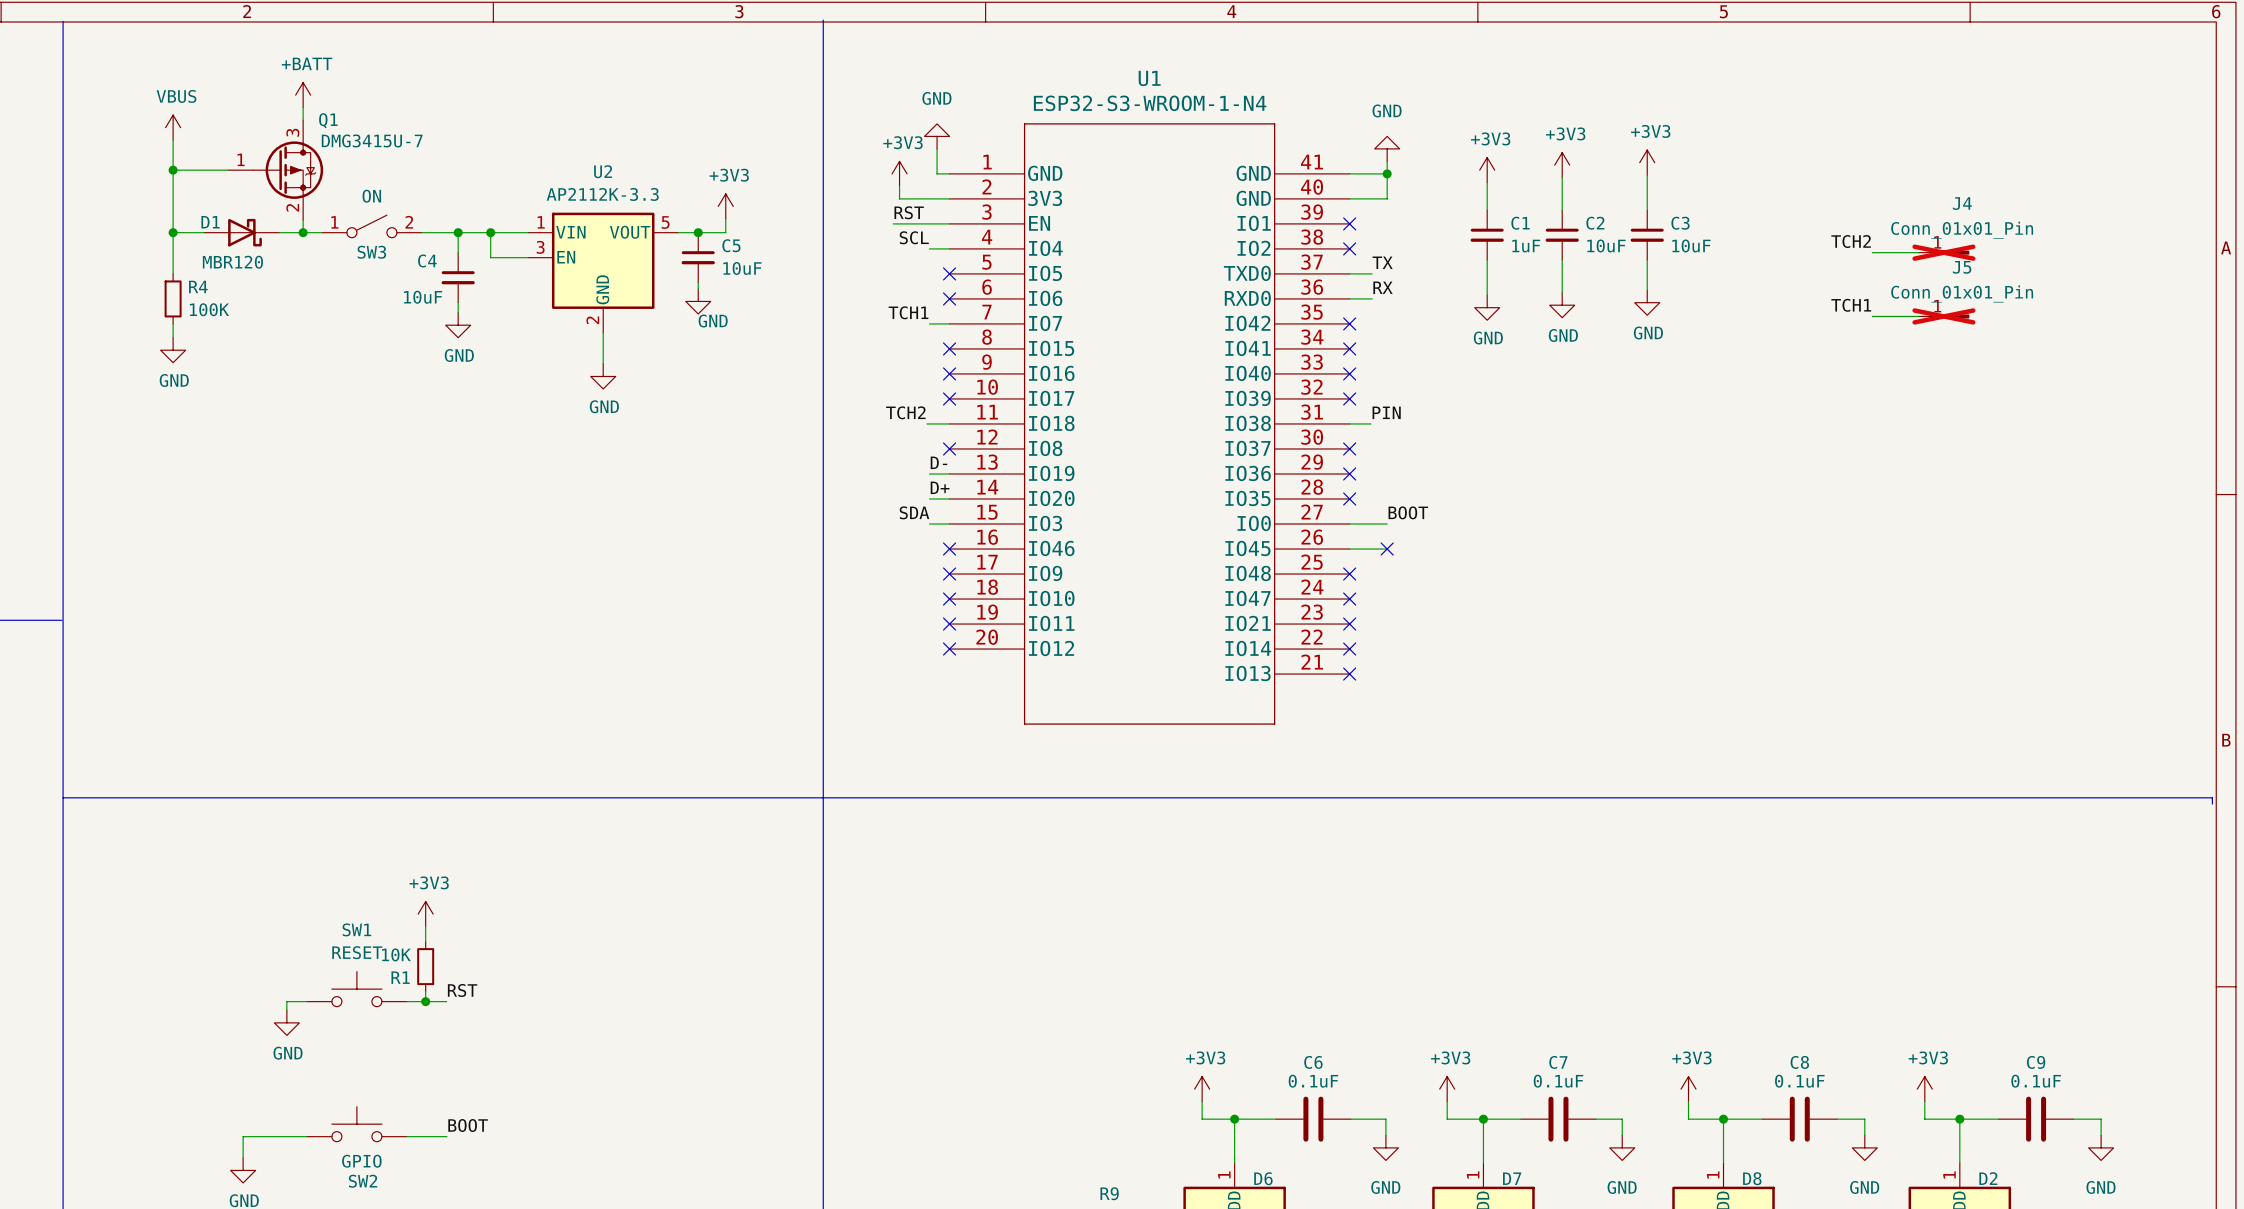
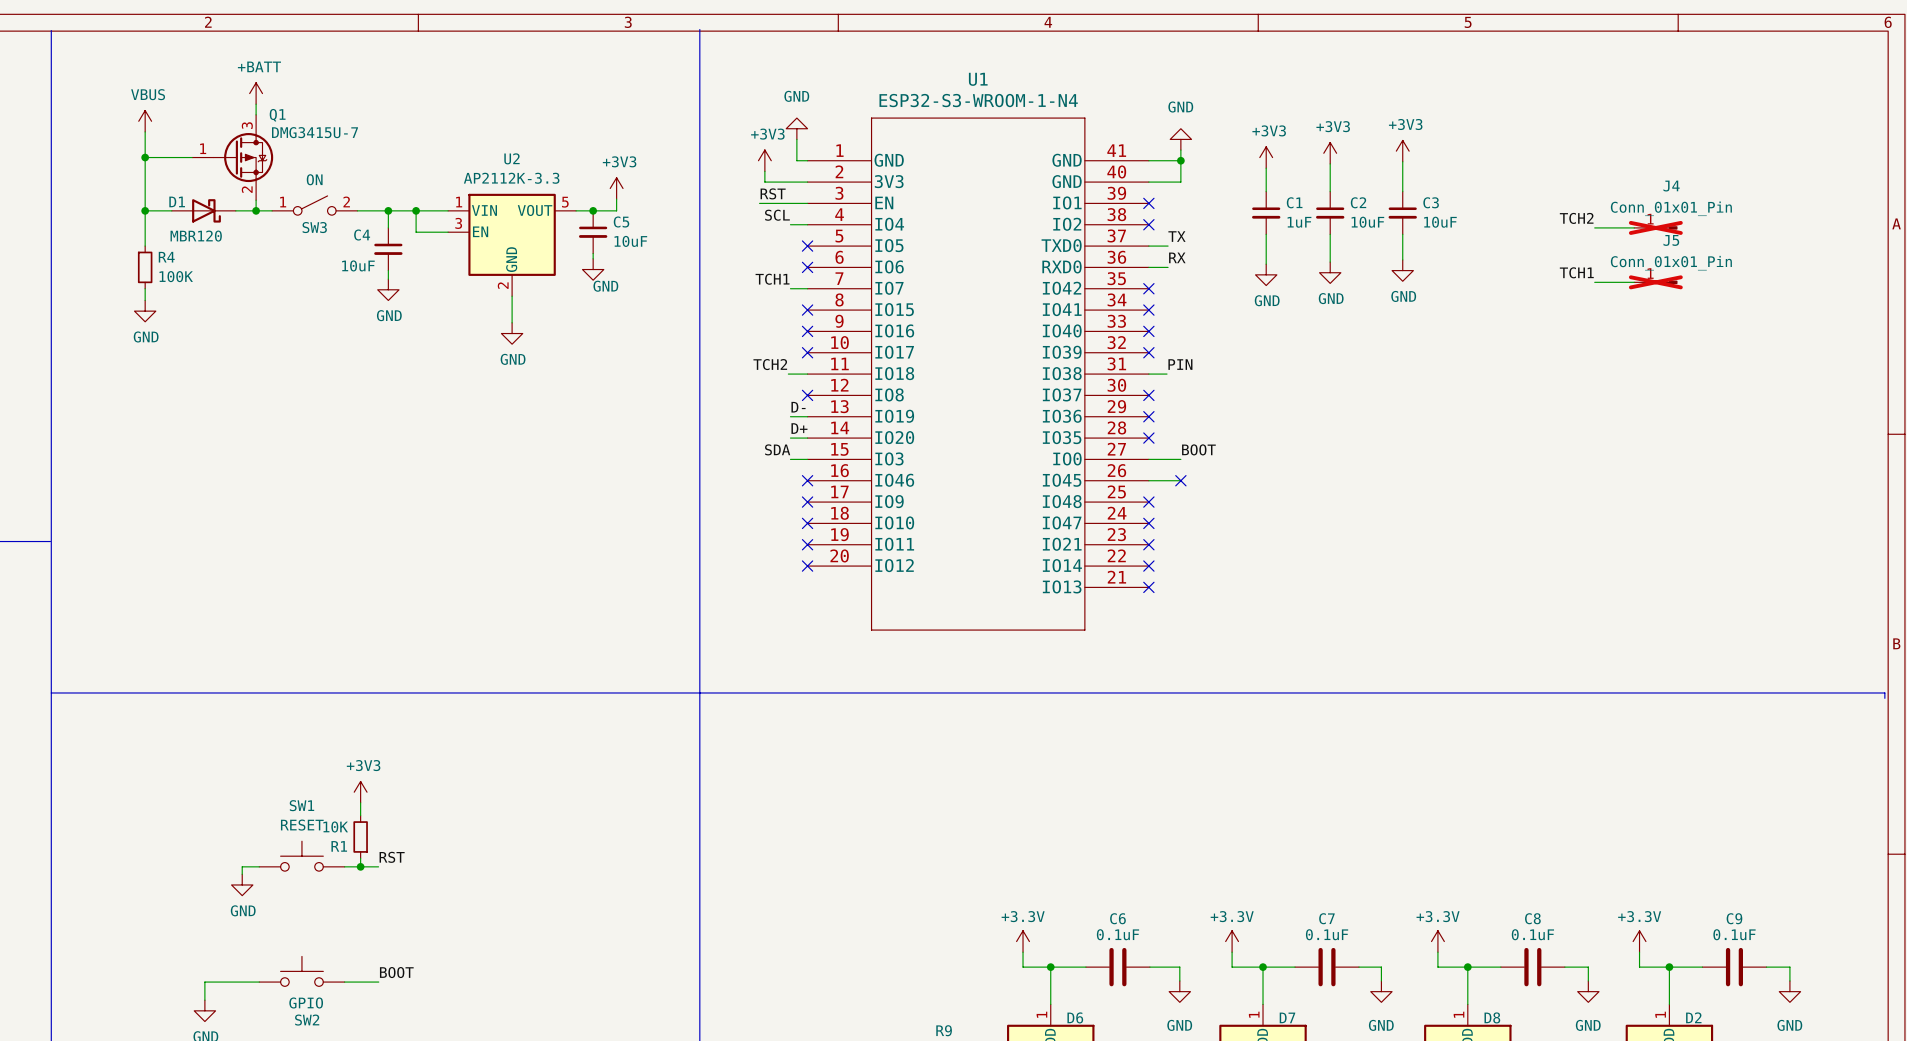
power symbol: +3V3 (1202, 1089) -> +3.3V (1023, 941)
power symbol: +3V3 (1447, 1089) -> +3.3V (1232, 941)
power symbol: +3V3 (1688, 1089) -> +3.3V (1437, 941)
power symbol: +3V3 (1924, 1089) -> +3.3V (1639, 941)

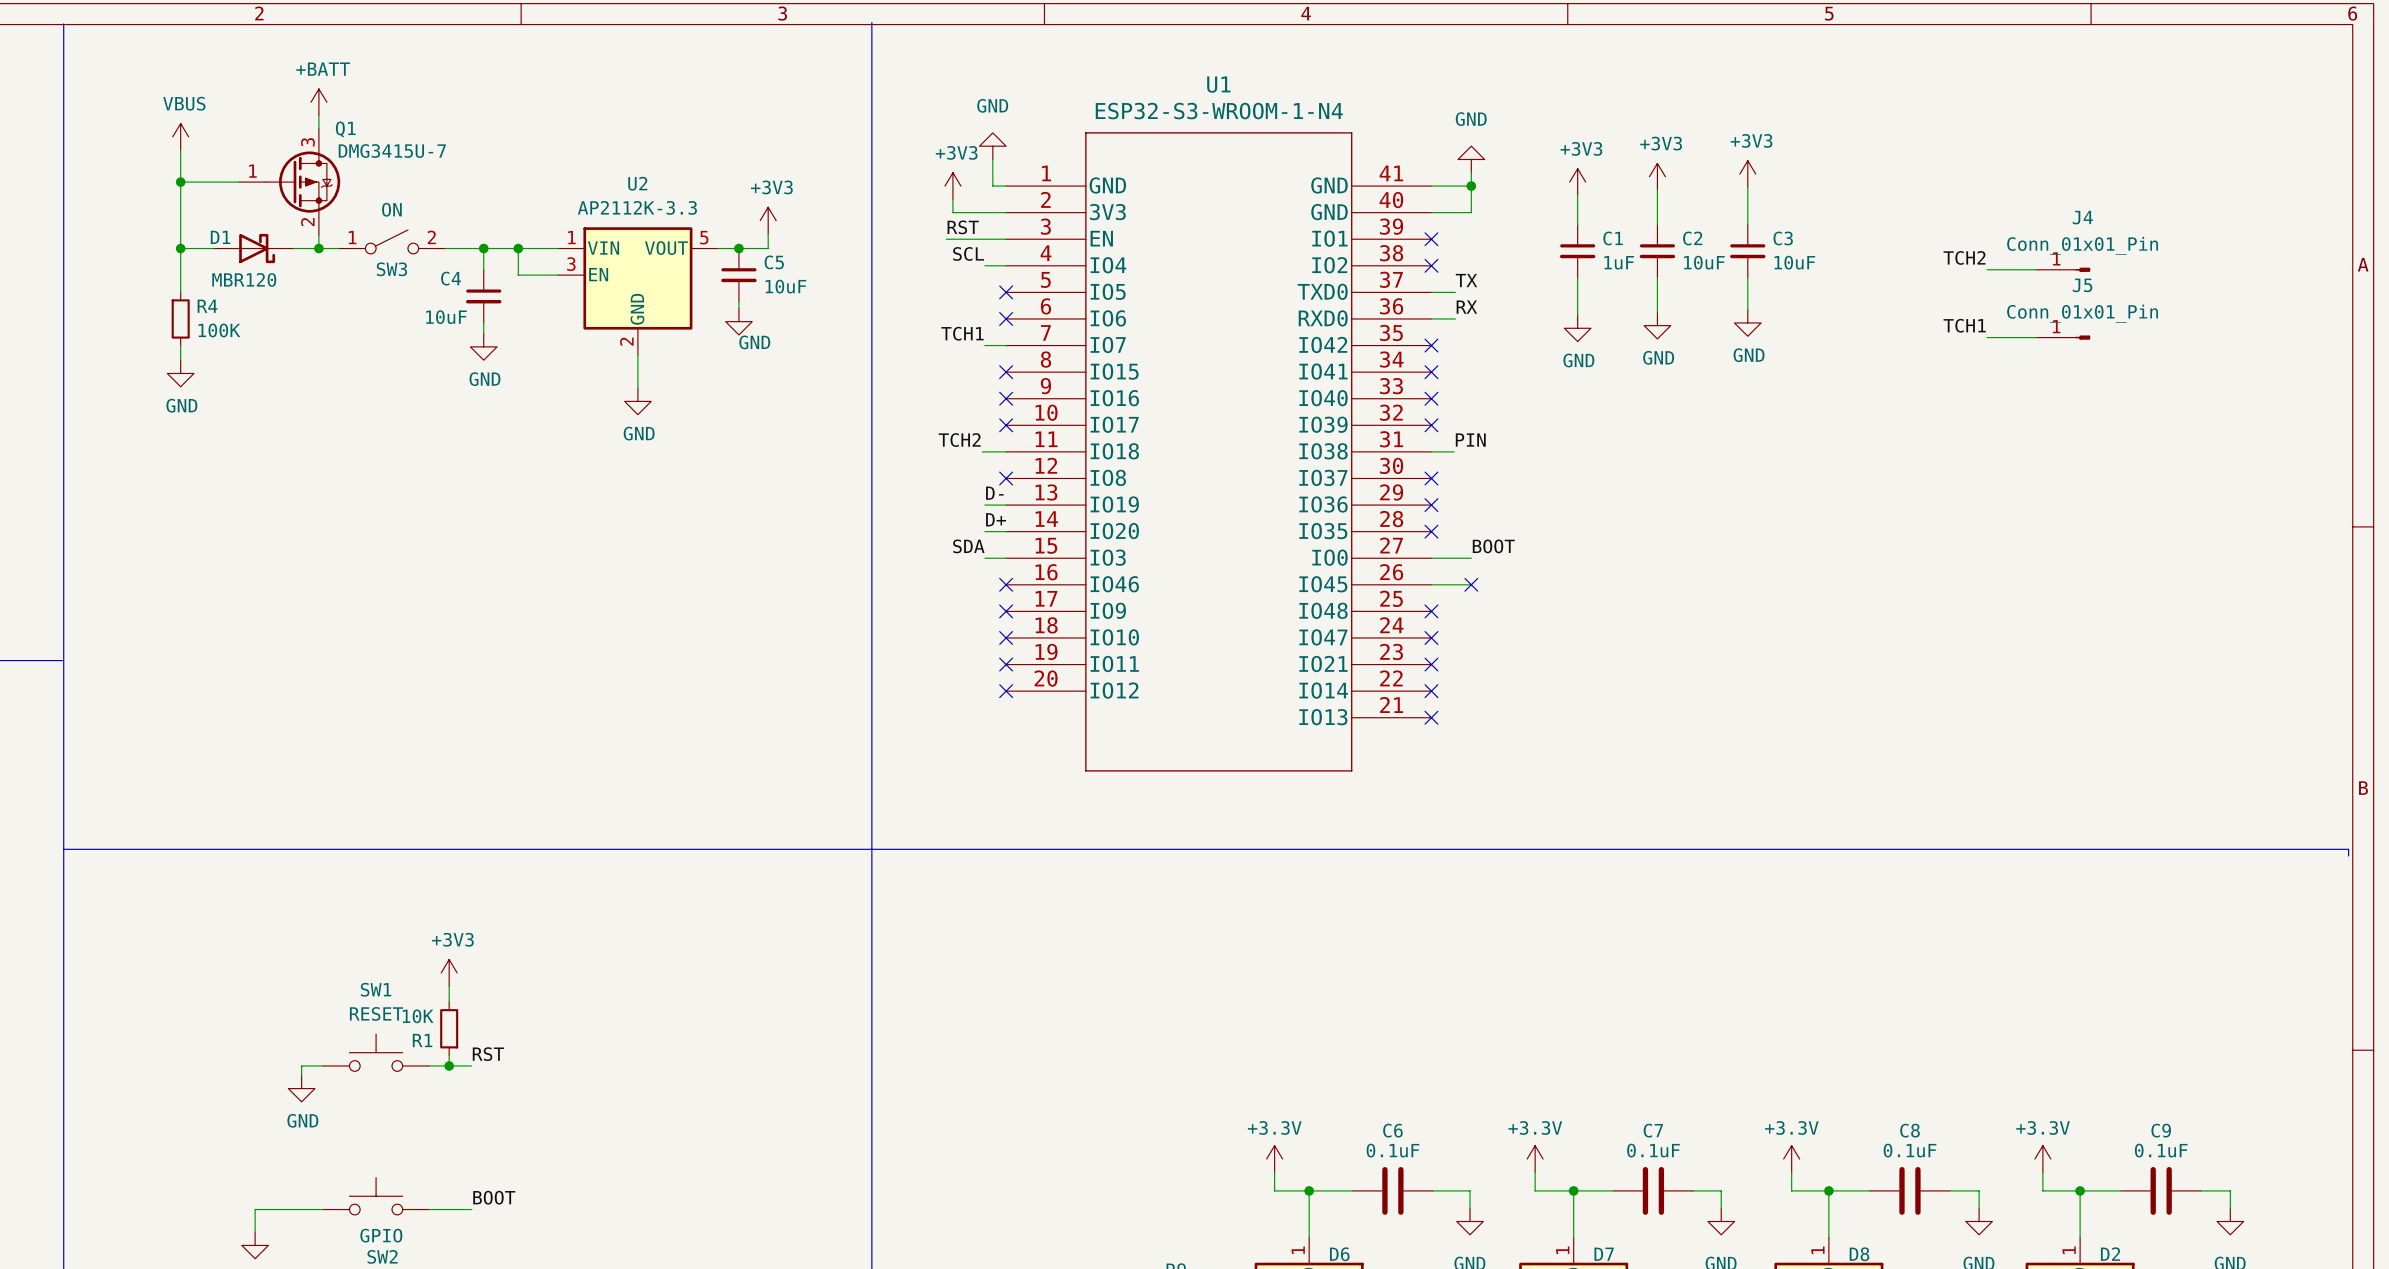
J4 do-not-place cross: (1655, 227) -> none
J5 do-not-place cross: (1655, 282) -> none

